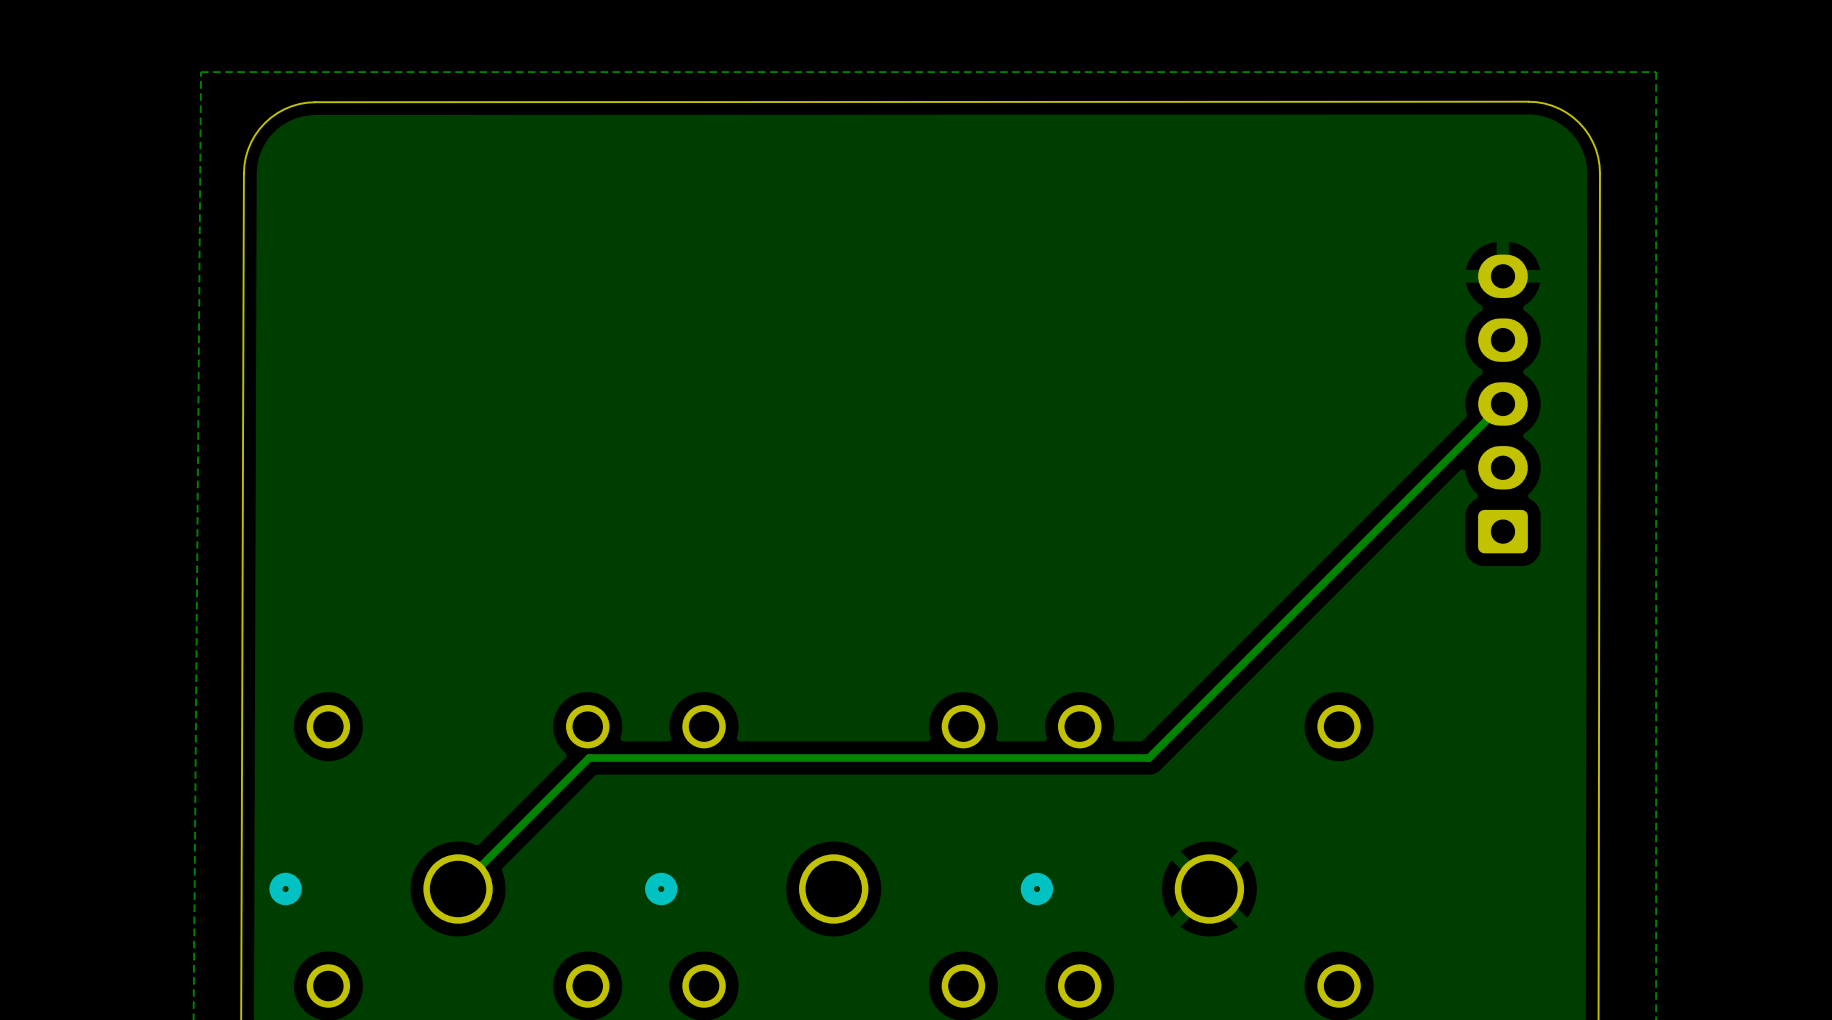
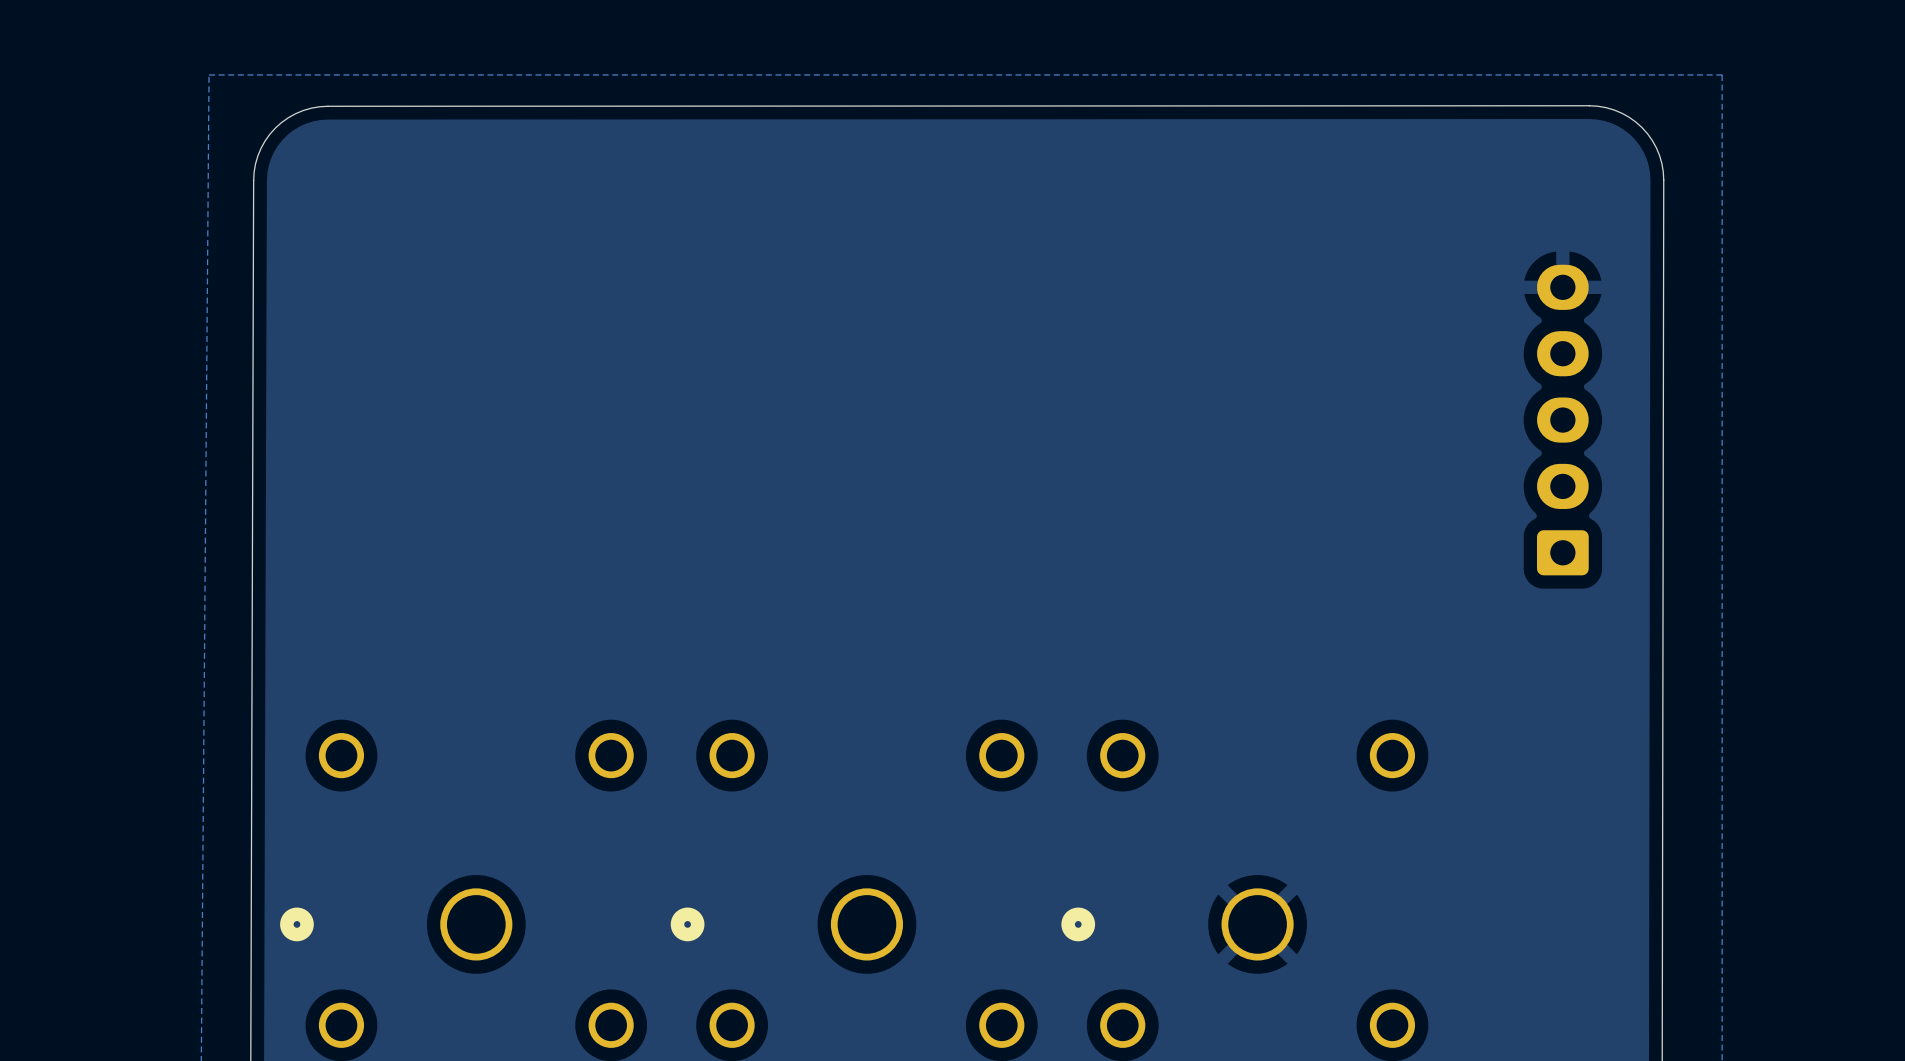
track: (1502, 403) (1148, 758) (589, 758) (458, 889) -> none

